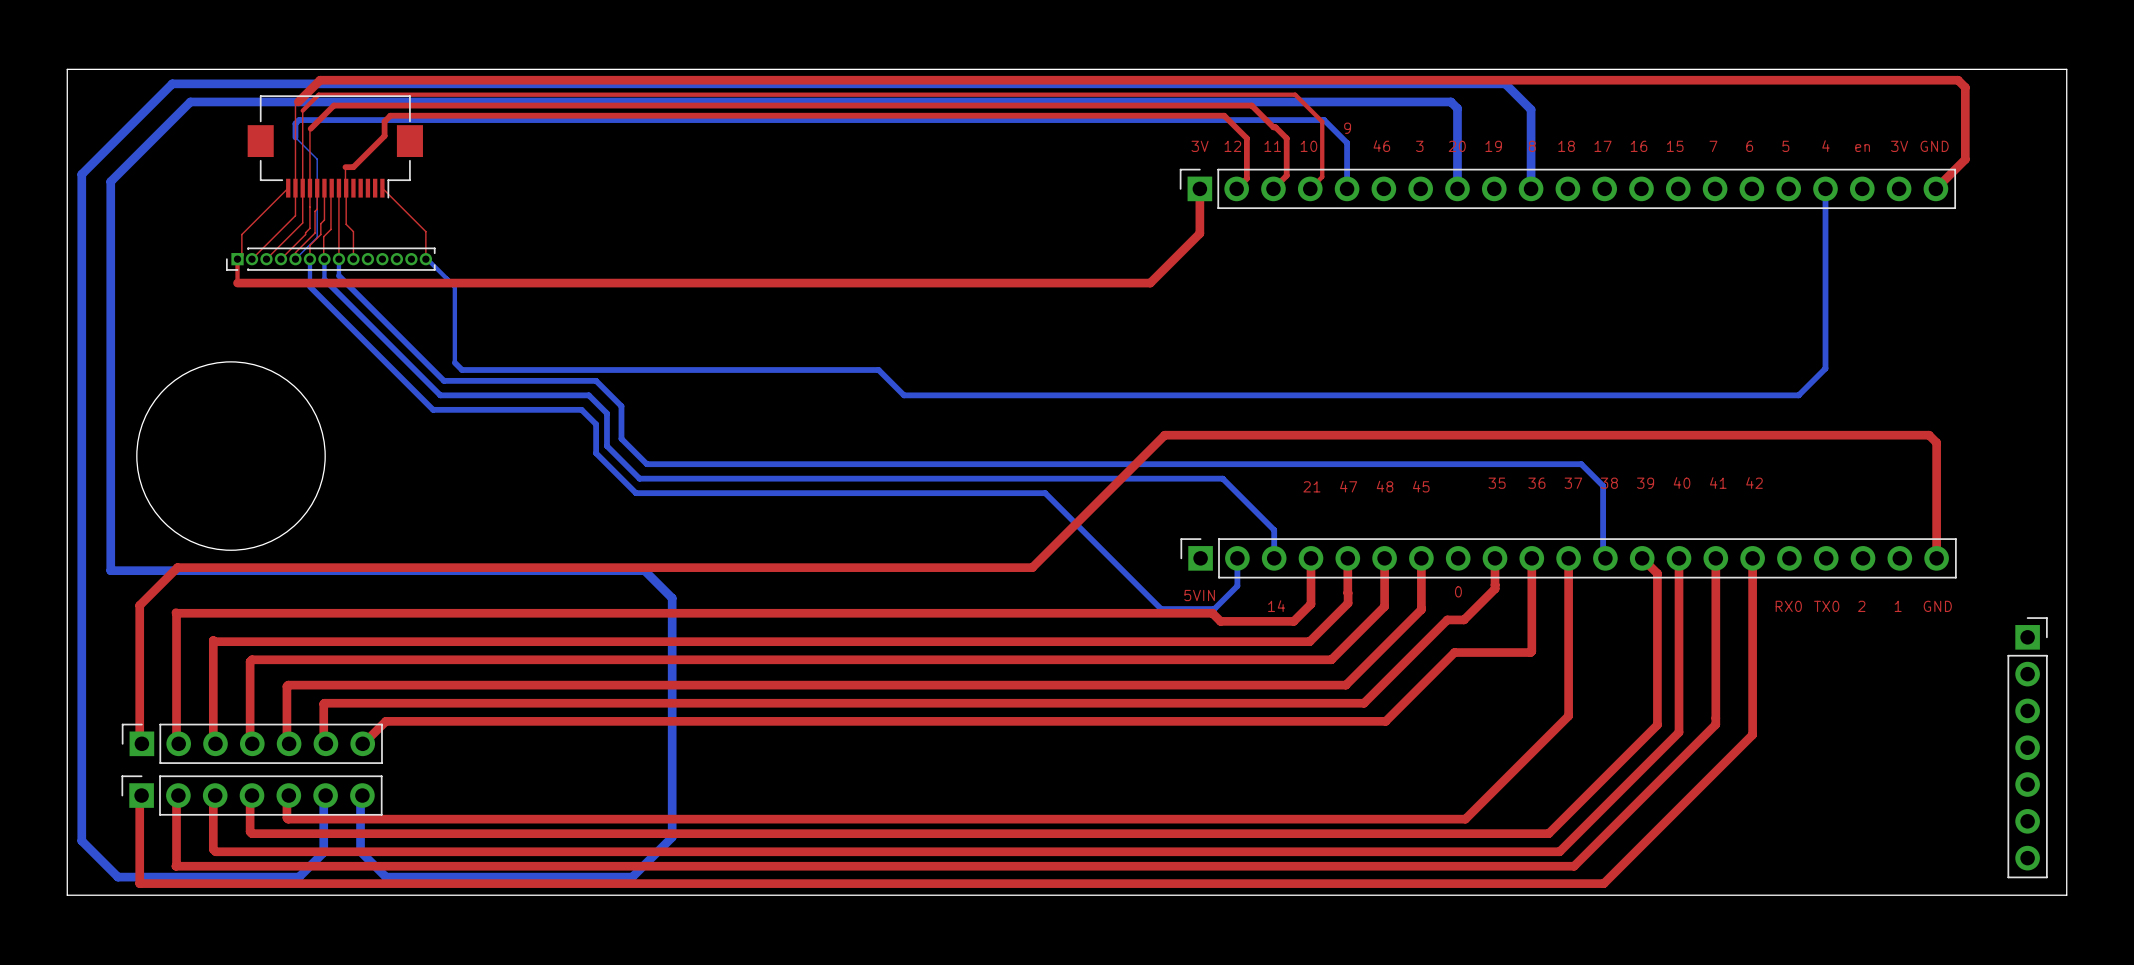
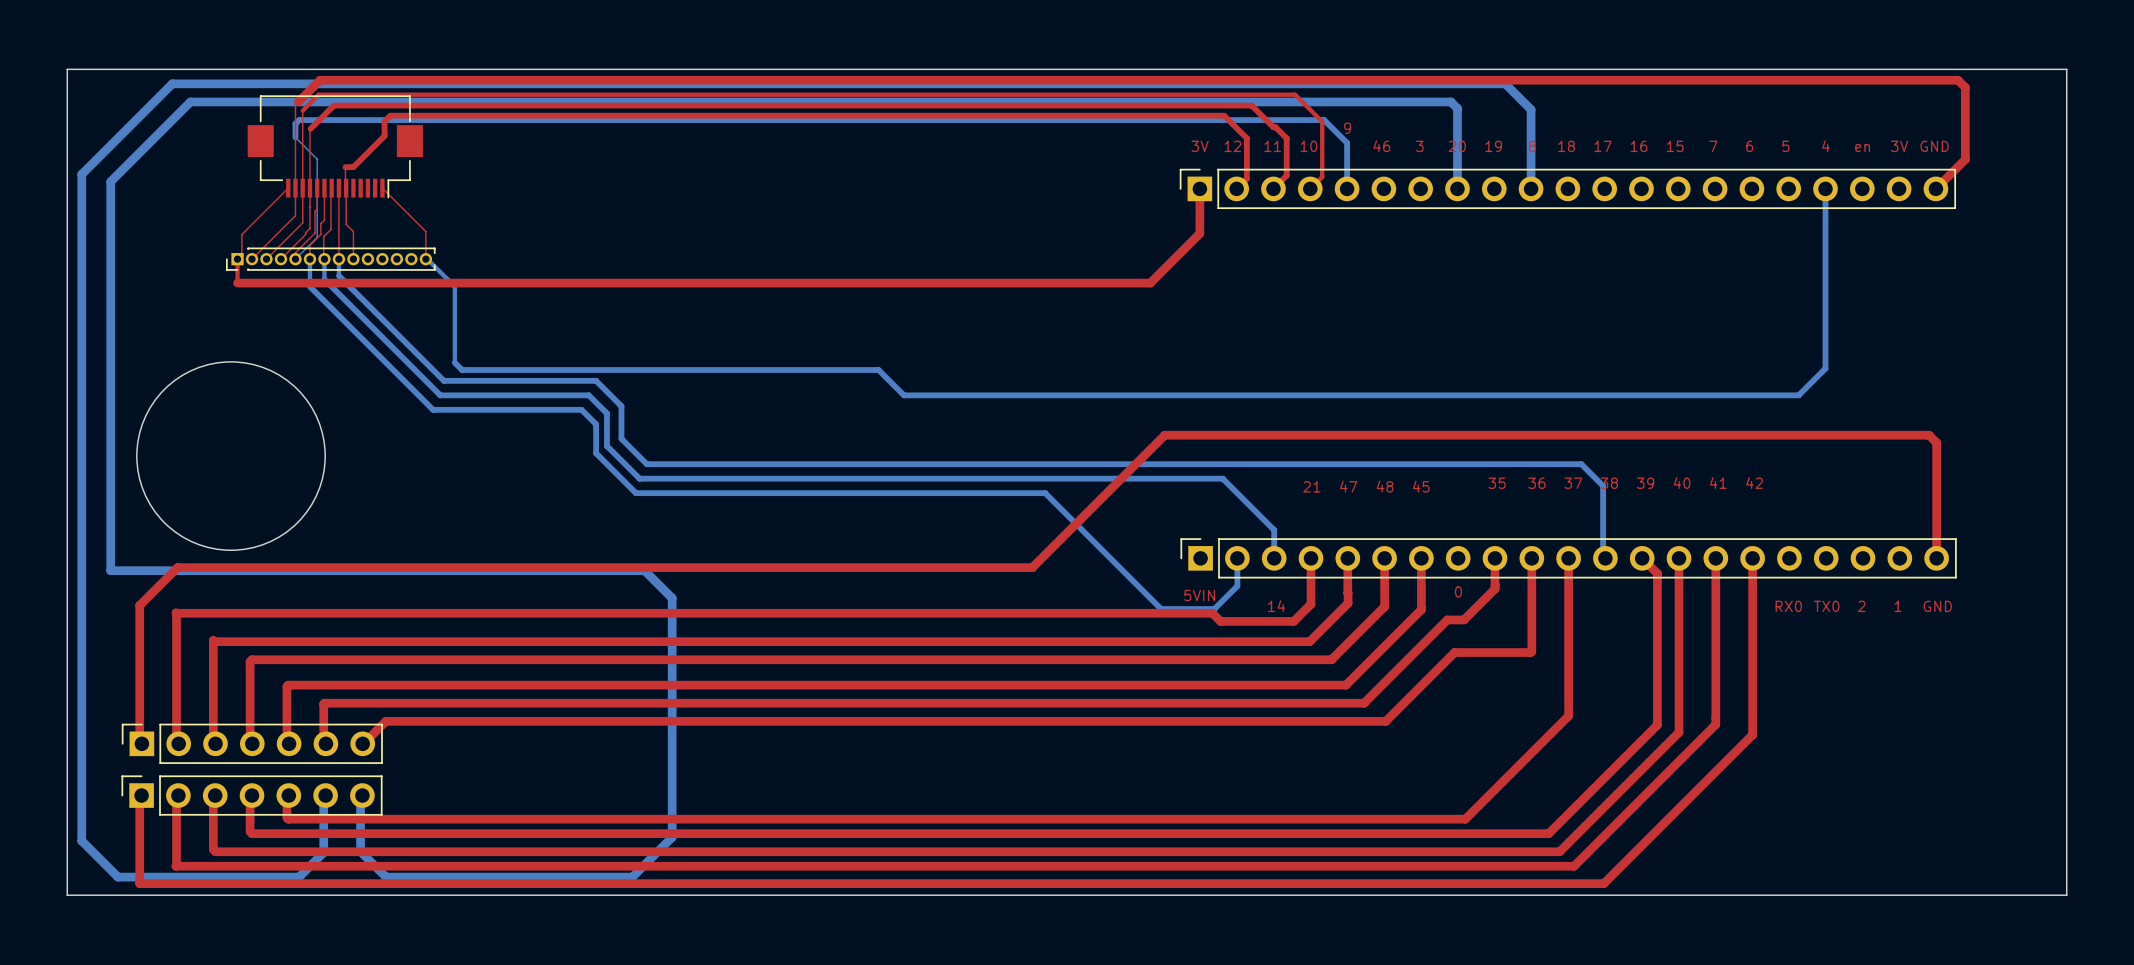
part: (2027, 747) -> none

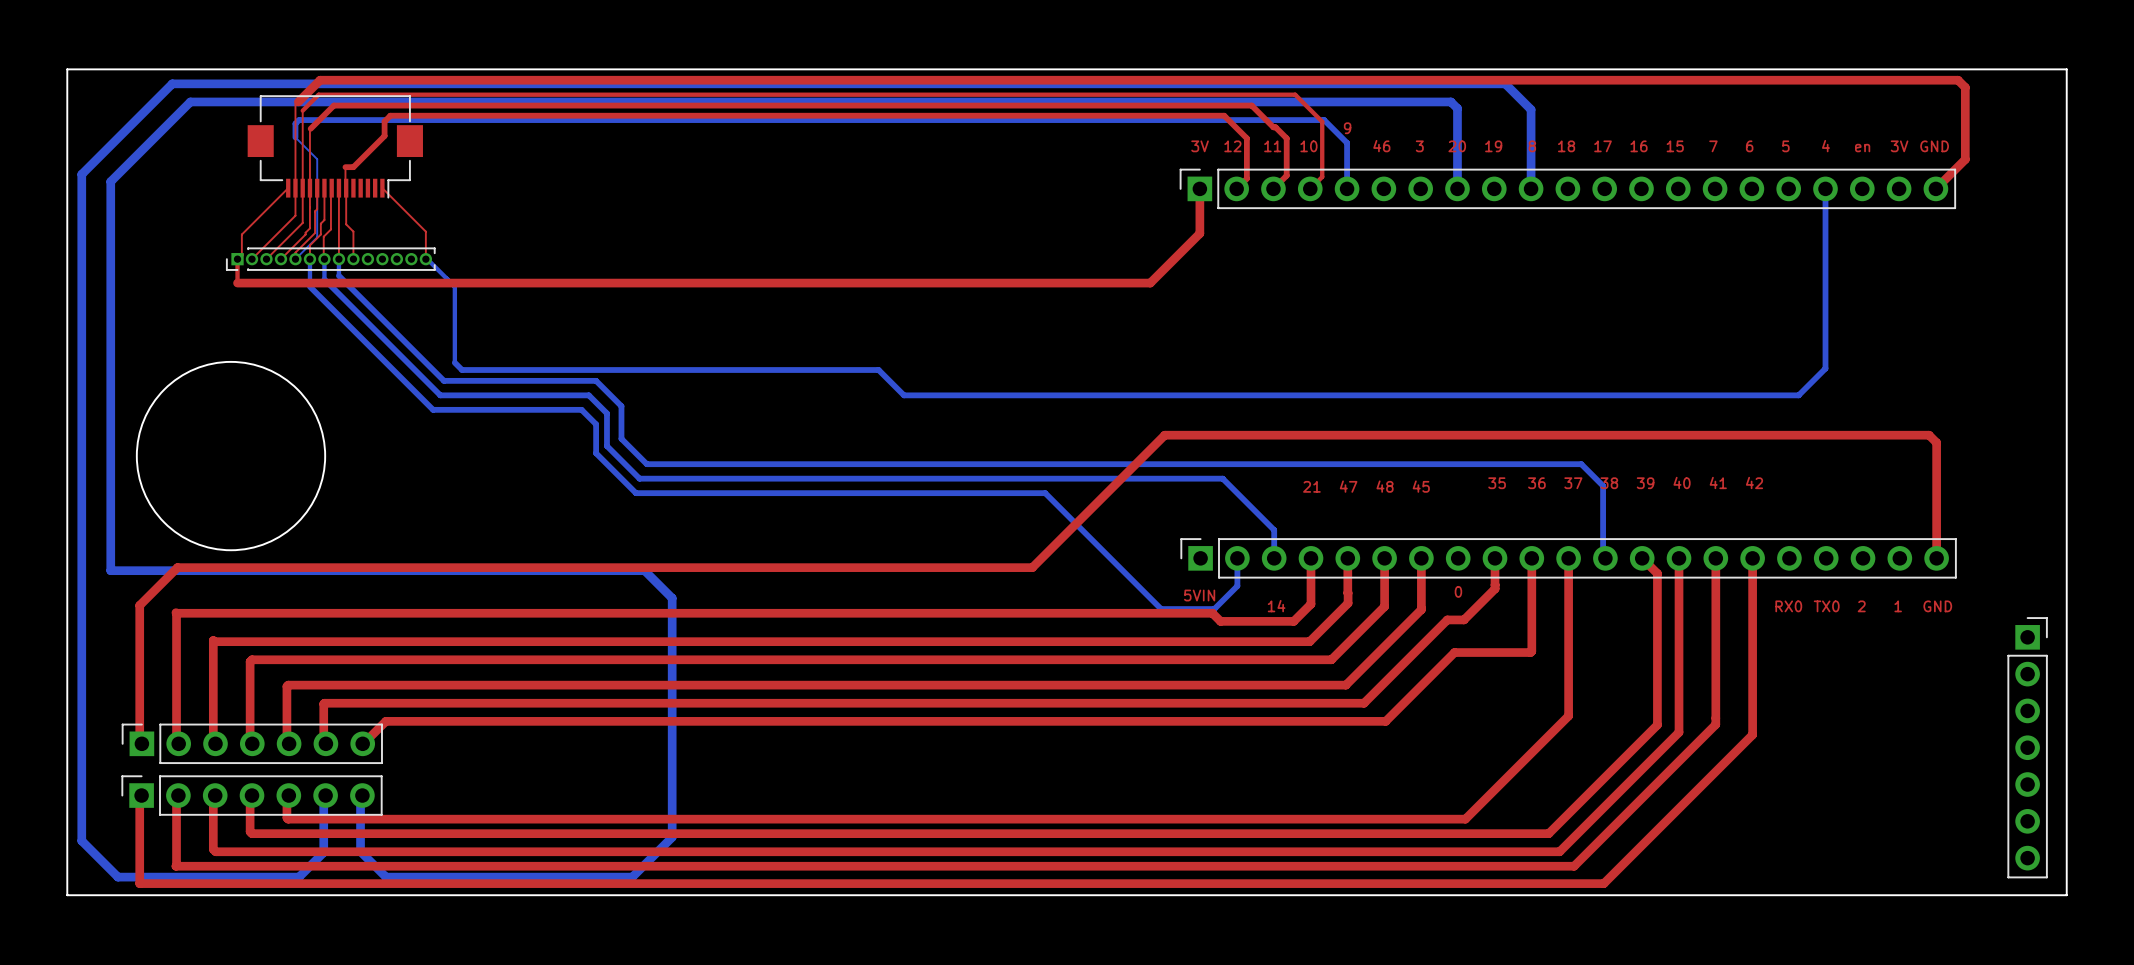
part: none -> (2027, 747)

